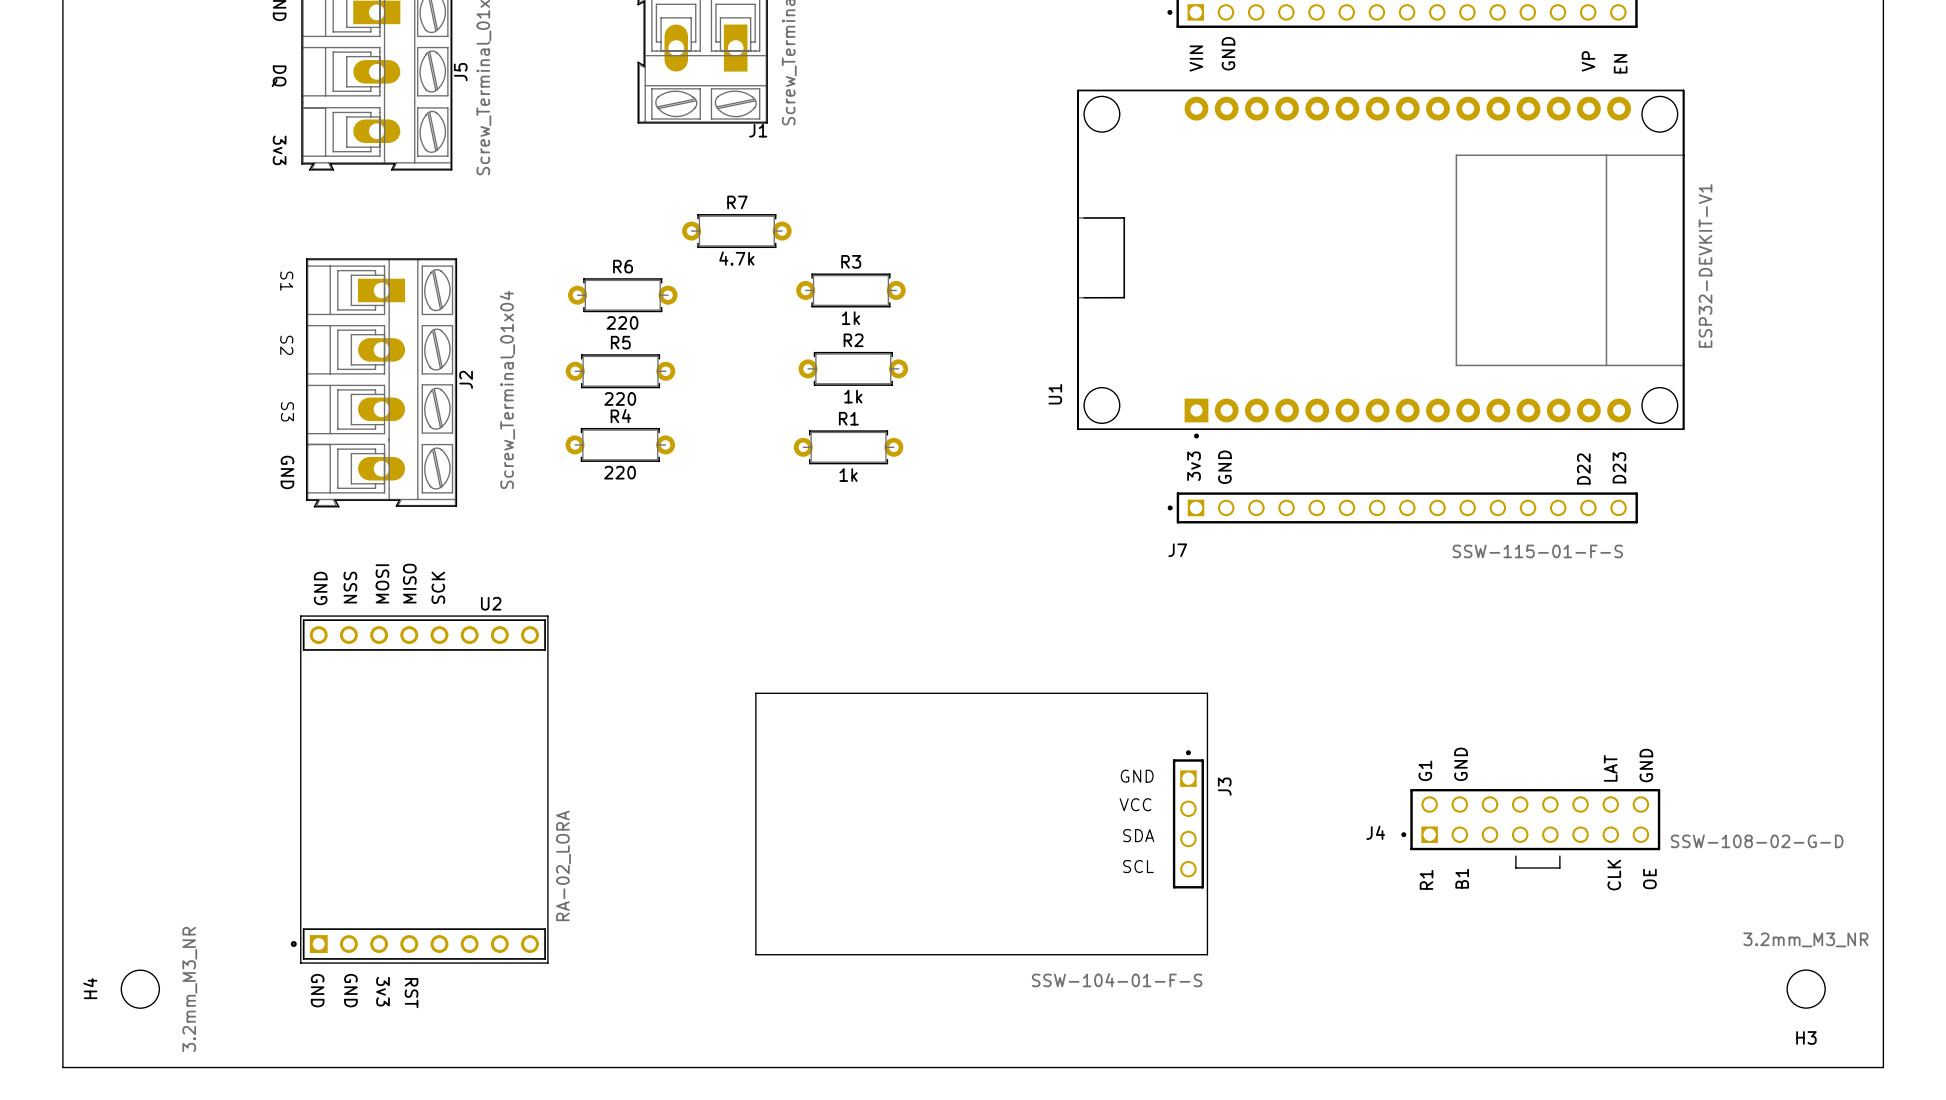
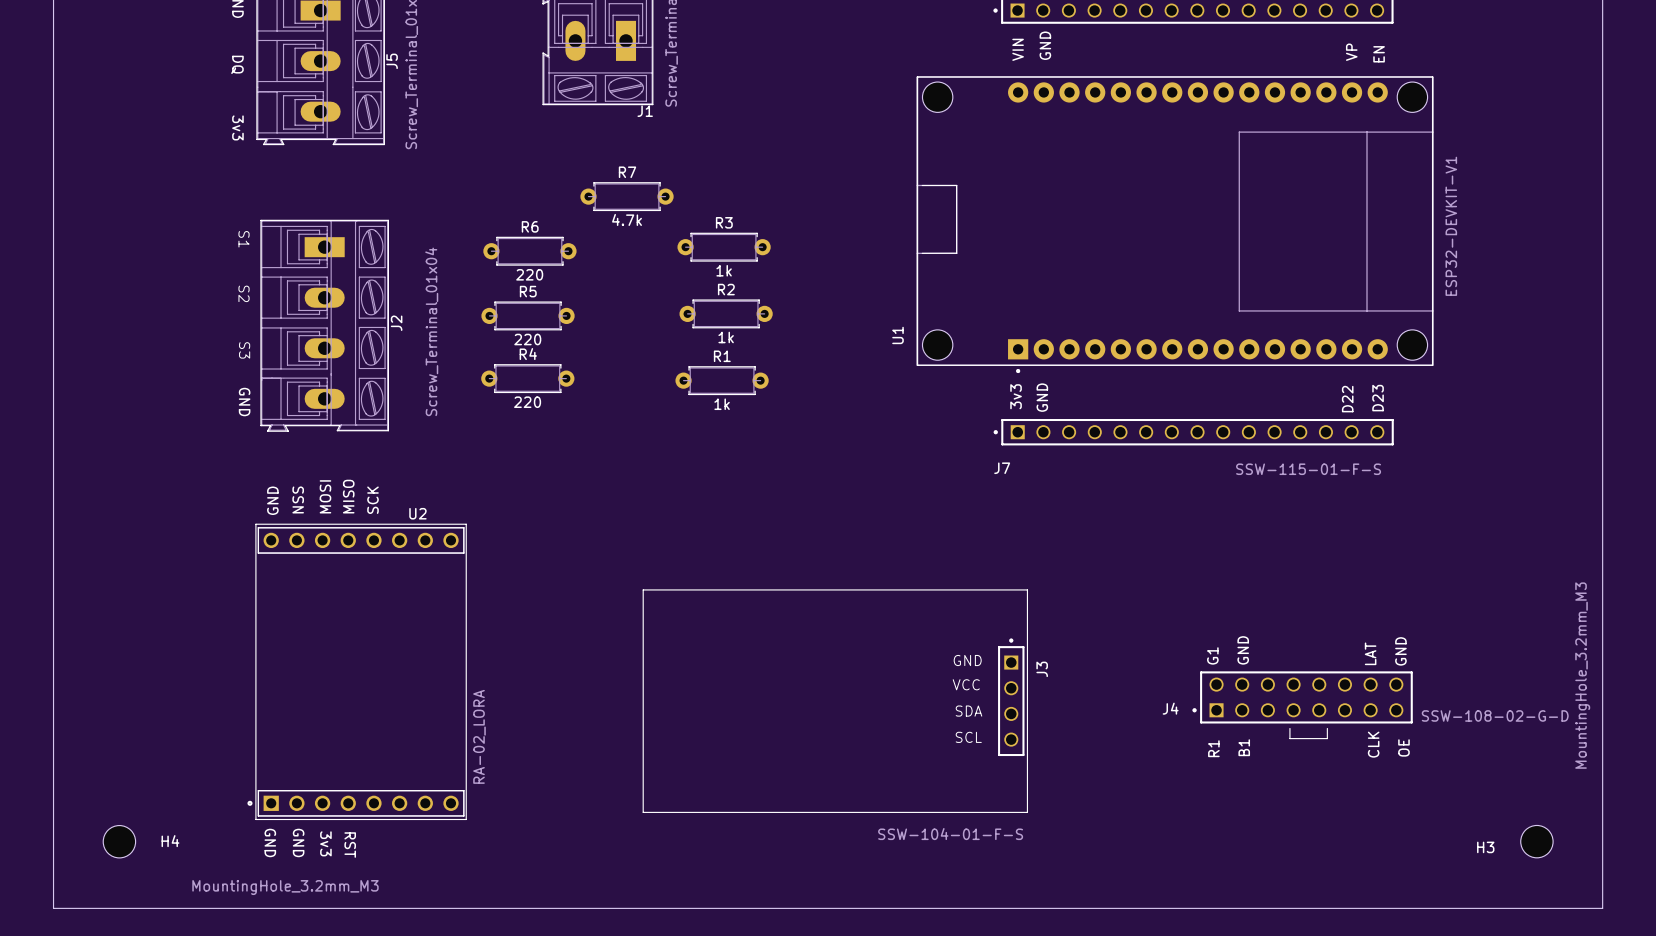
H3 value: 3.2mm_M3_NR (1805, 939) -> MountingHole_3.2mm_M3 (1582, 675)
H4 name rotation: 0° (90, 988) -> 90° clockwise (170, 841)
H4 name position: H4 (90, 988) -> H4 (170, 841)
H4 value: 3.2mm_M3_NR (189, 989) -> MountingHole_3.2mm_M3 (285, 887)
H3 name position: H3 (1806, 1037) -> H3 (1485, 847)

